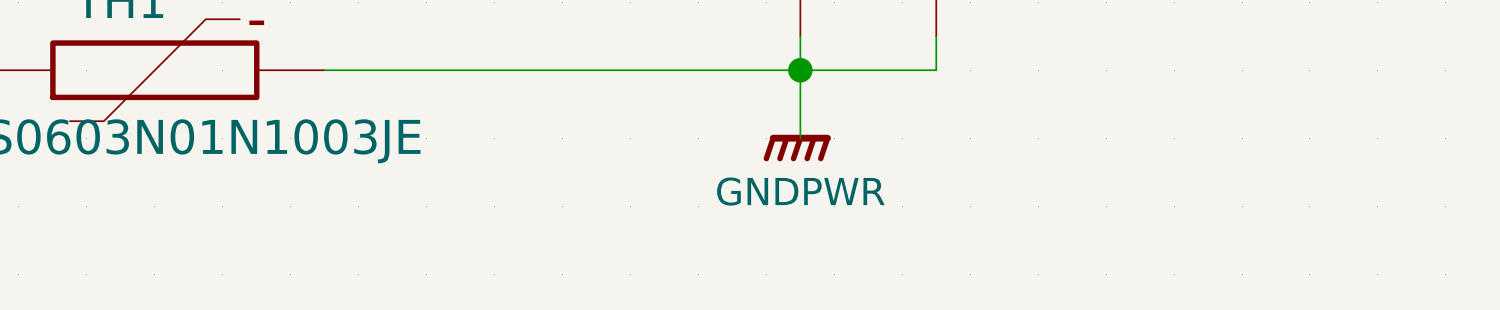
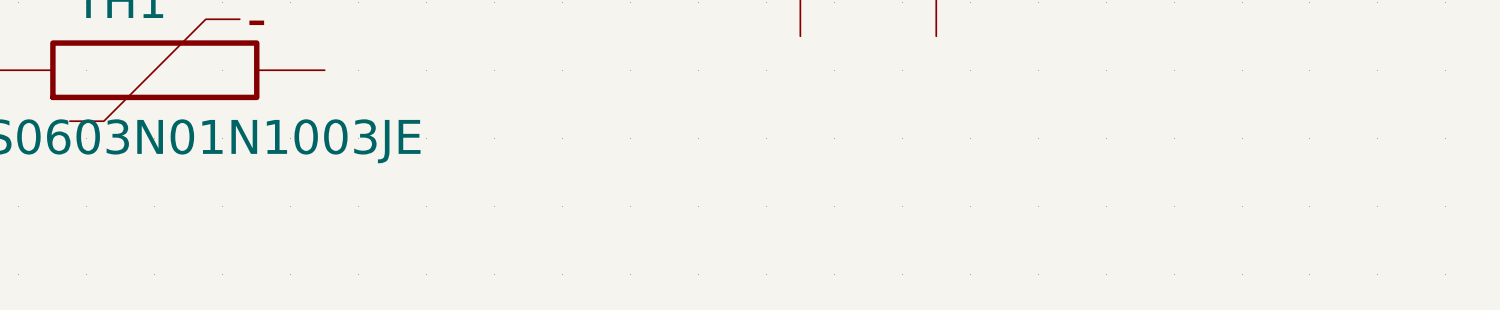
wire: (800, 36) (800, 138) -> none
wire: (936, 36) (936, 70) (324, 70) -> none
junction: (800, 70) -> none
power symbol: GNDPWR (797, 148) -> none

